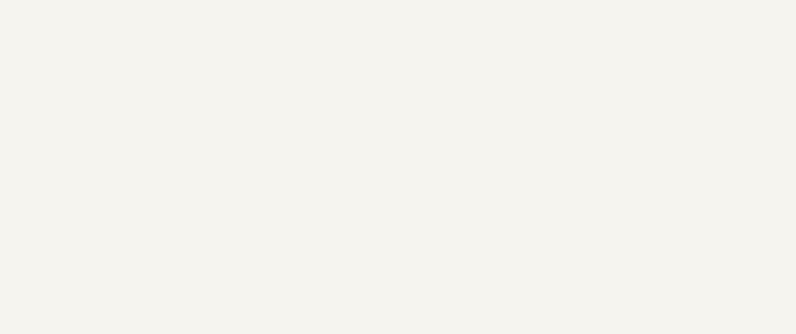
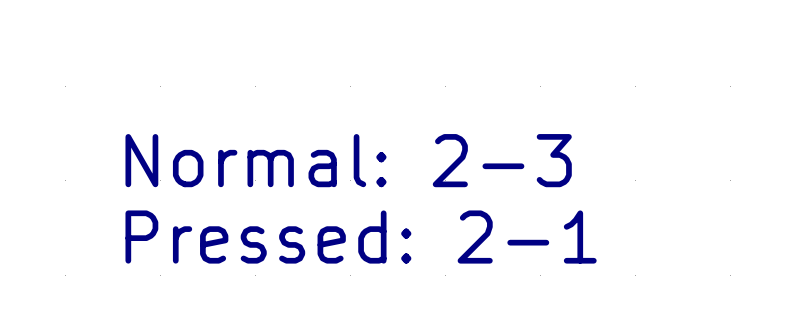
text: none -> Normal: 2-3 (348, 160)
text: none -> Pressed: 2-1 (361, 237)

